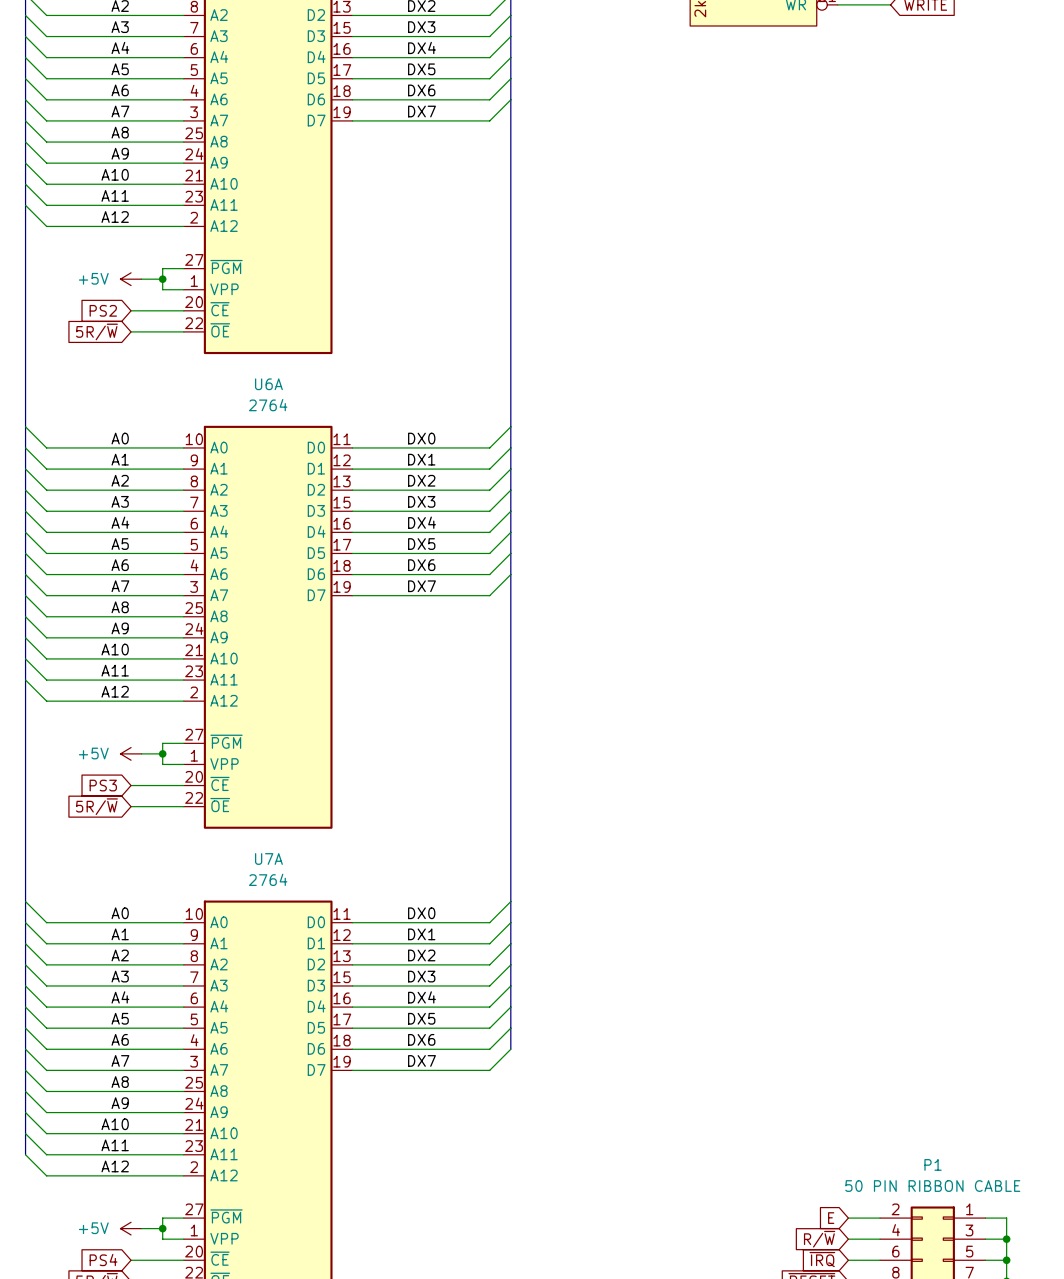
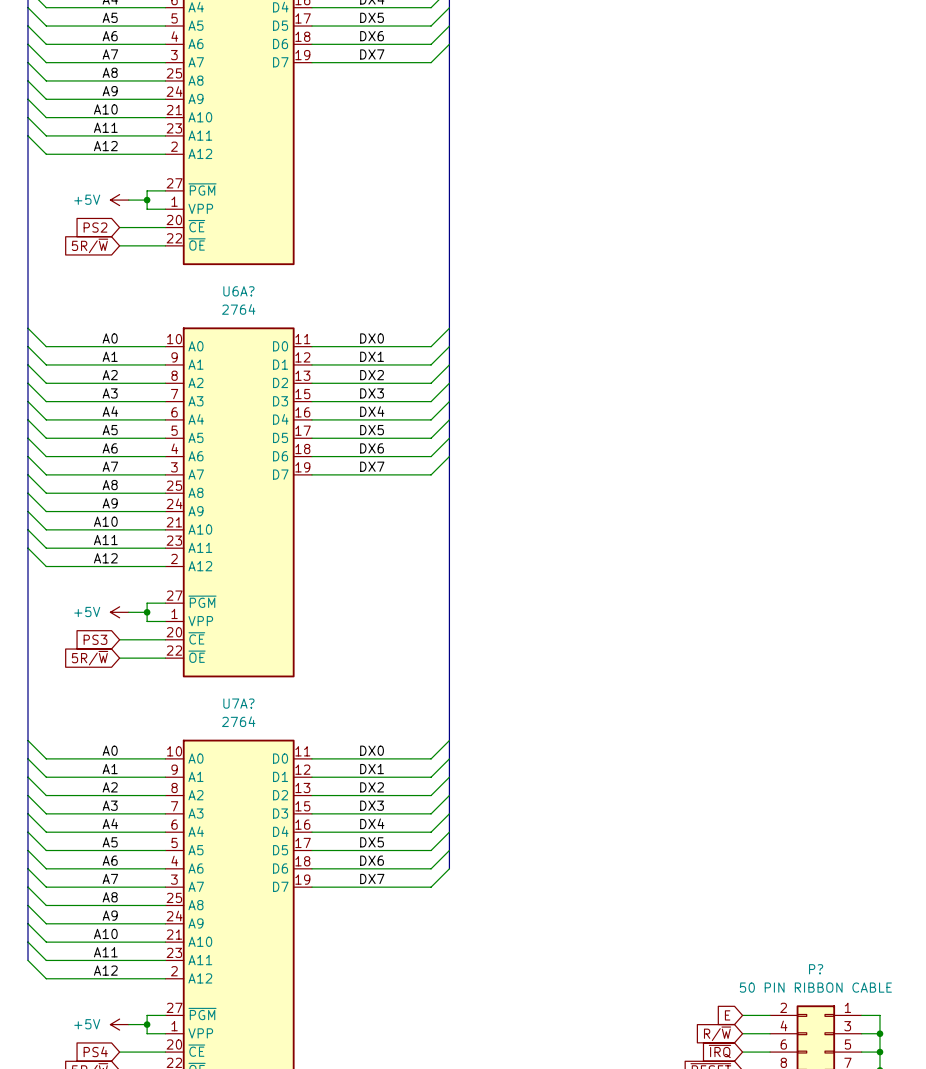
U6A name: U6A (268, 384) -> U6A? (238, 291)
U7A name: U7A (268, 859) -> U7A? (238, 703)
P1 name: P1 (933, 1164) -> P? (816, 969)

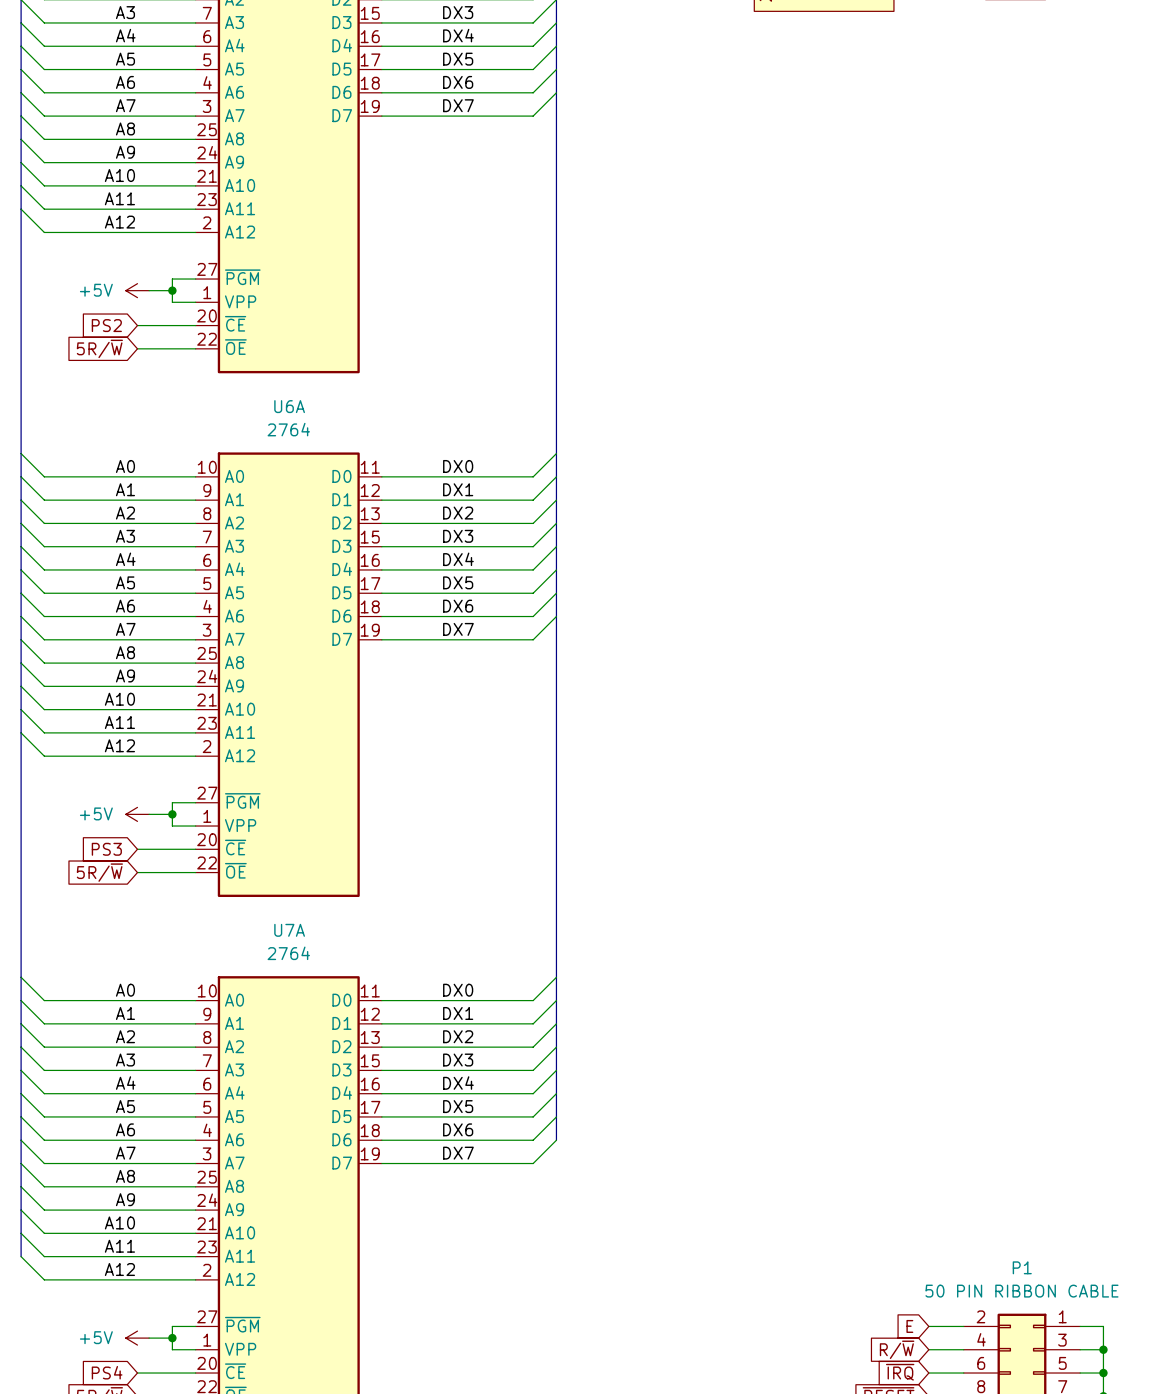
U6A? name: U6A? (238, 291) -> U6A (289, 406)
U7A? name: U7A? (238, 703) -> U7A (289, 930)
P? name: P? (816, 969) -> P1 (1022, 1267)

